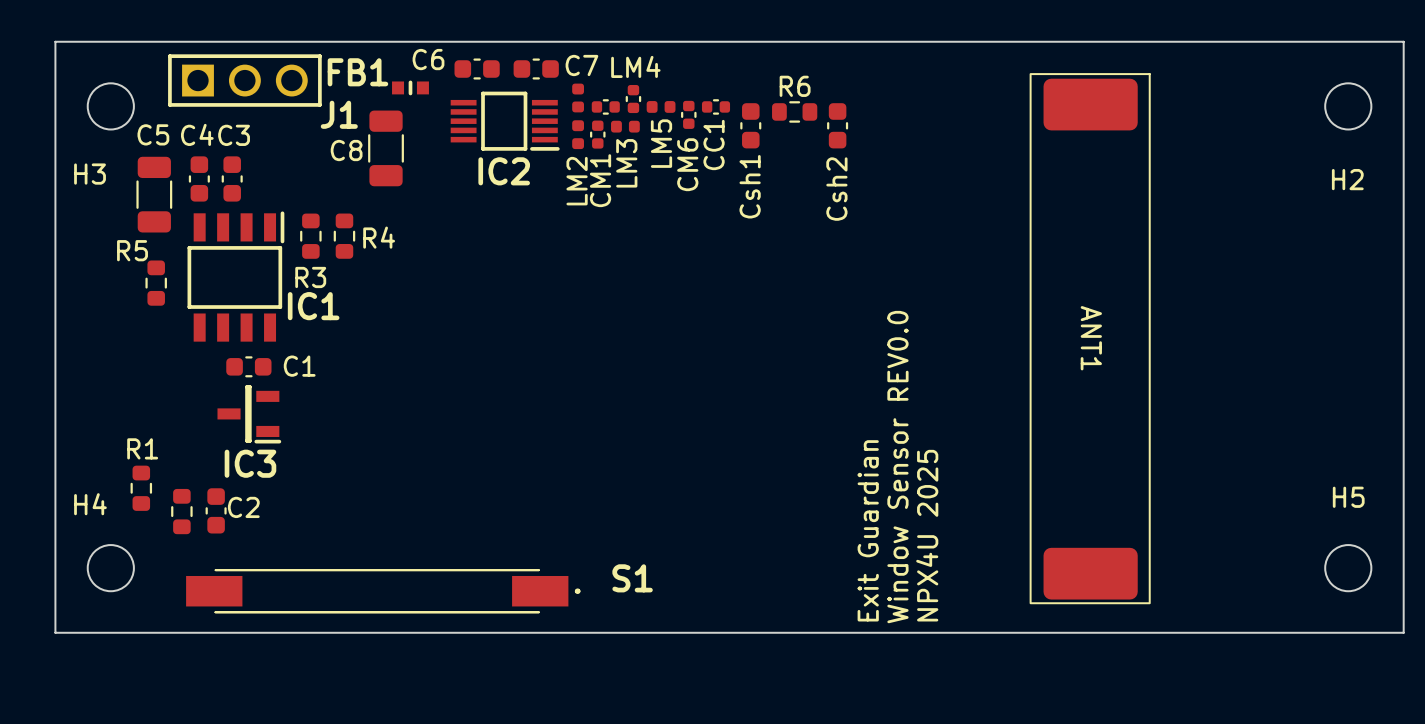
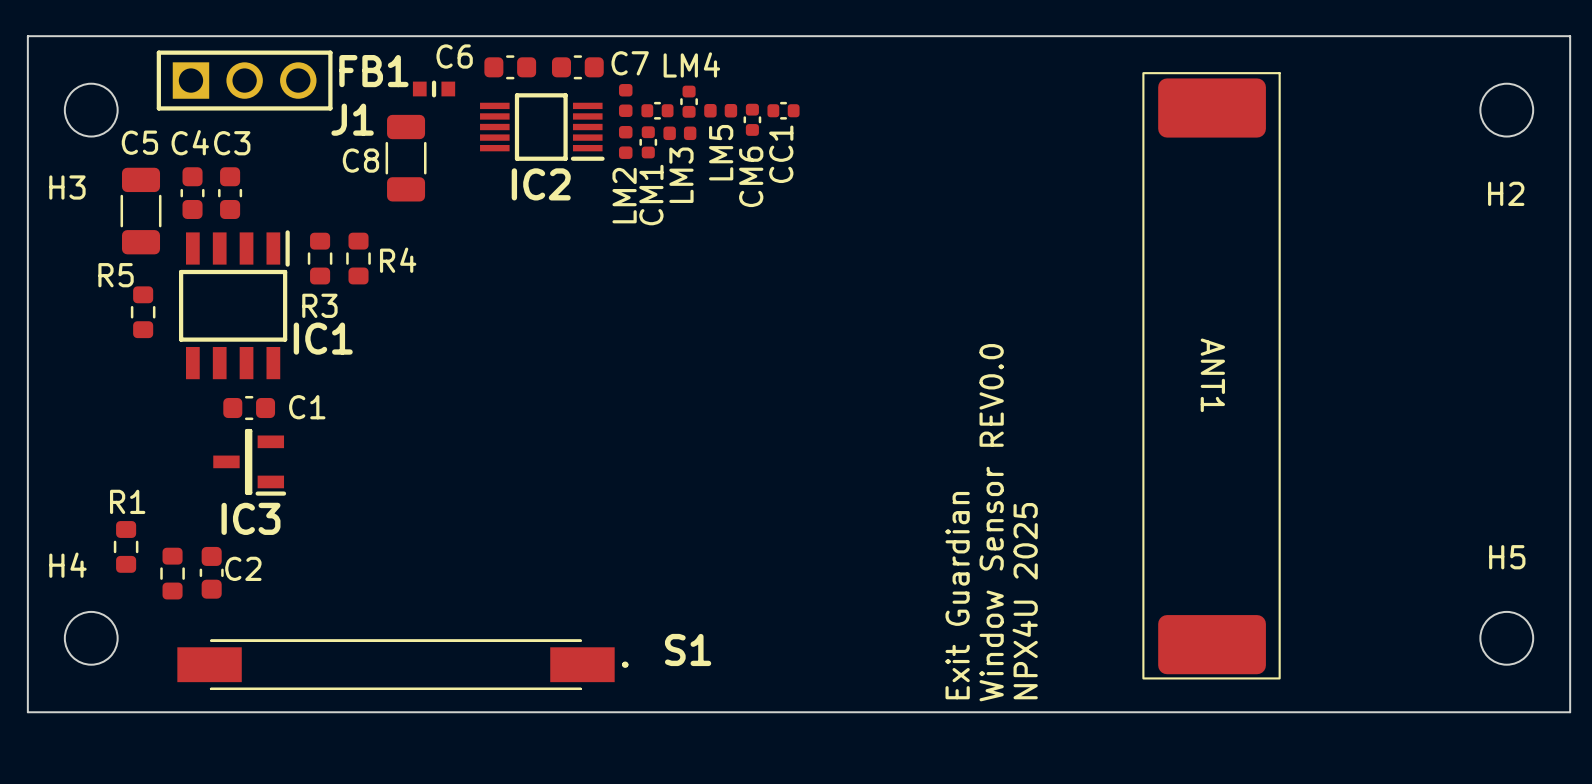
R6: (794, 111) -> none
Csh1: (750, 125) -> none
Csh2: (837, 125) -> none

